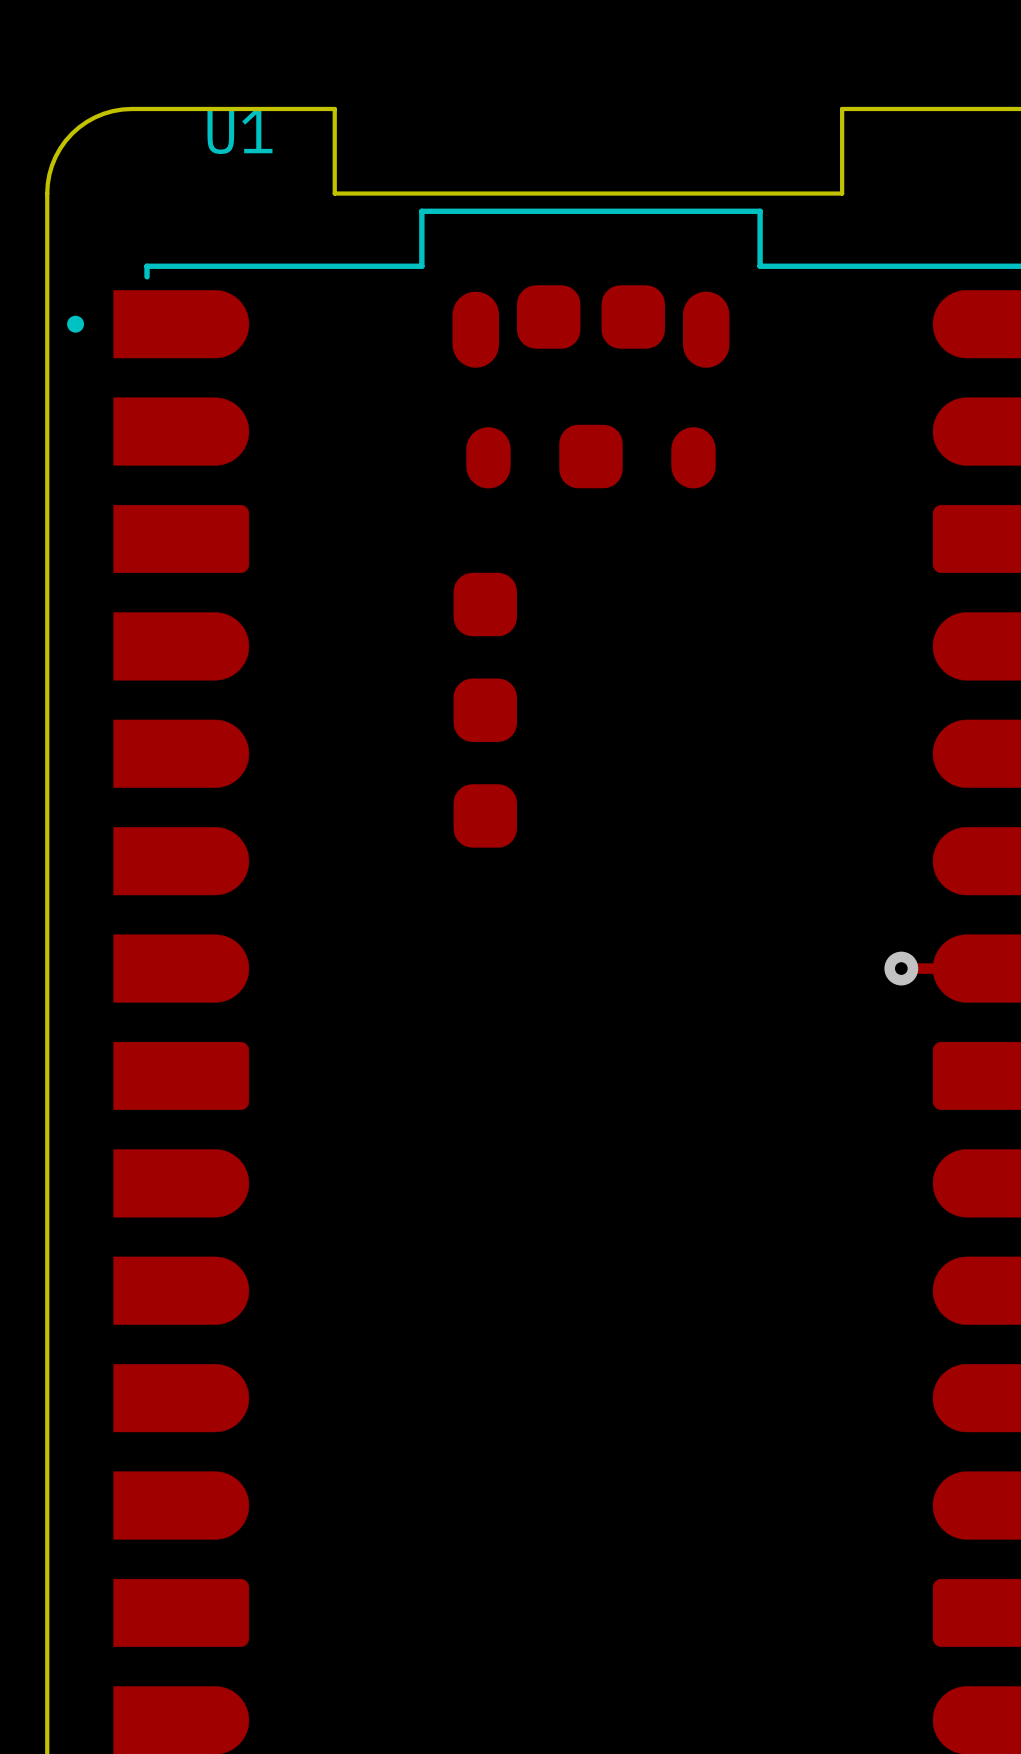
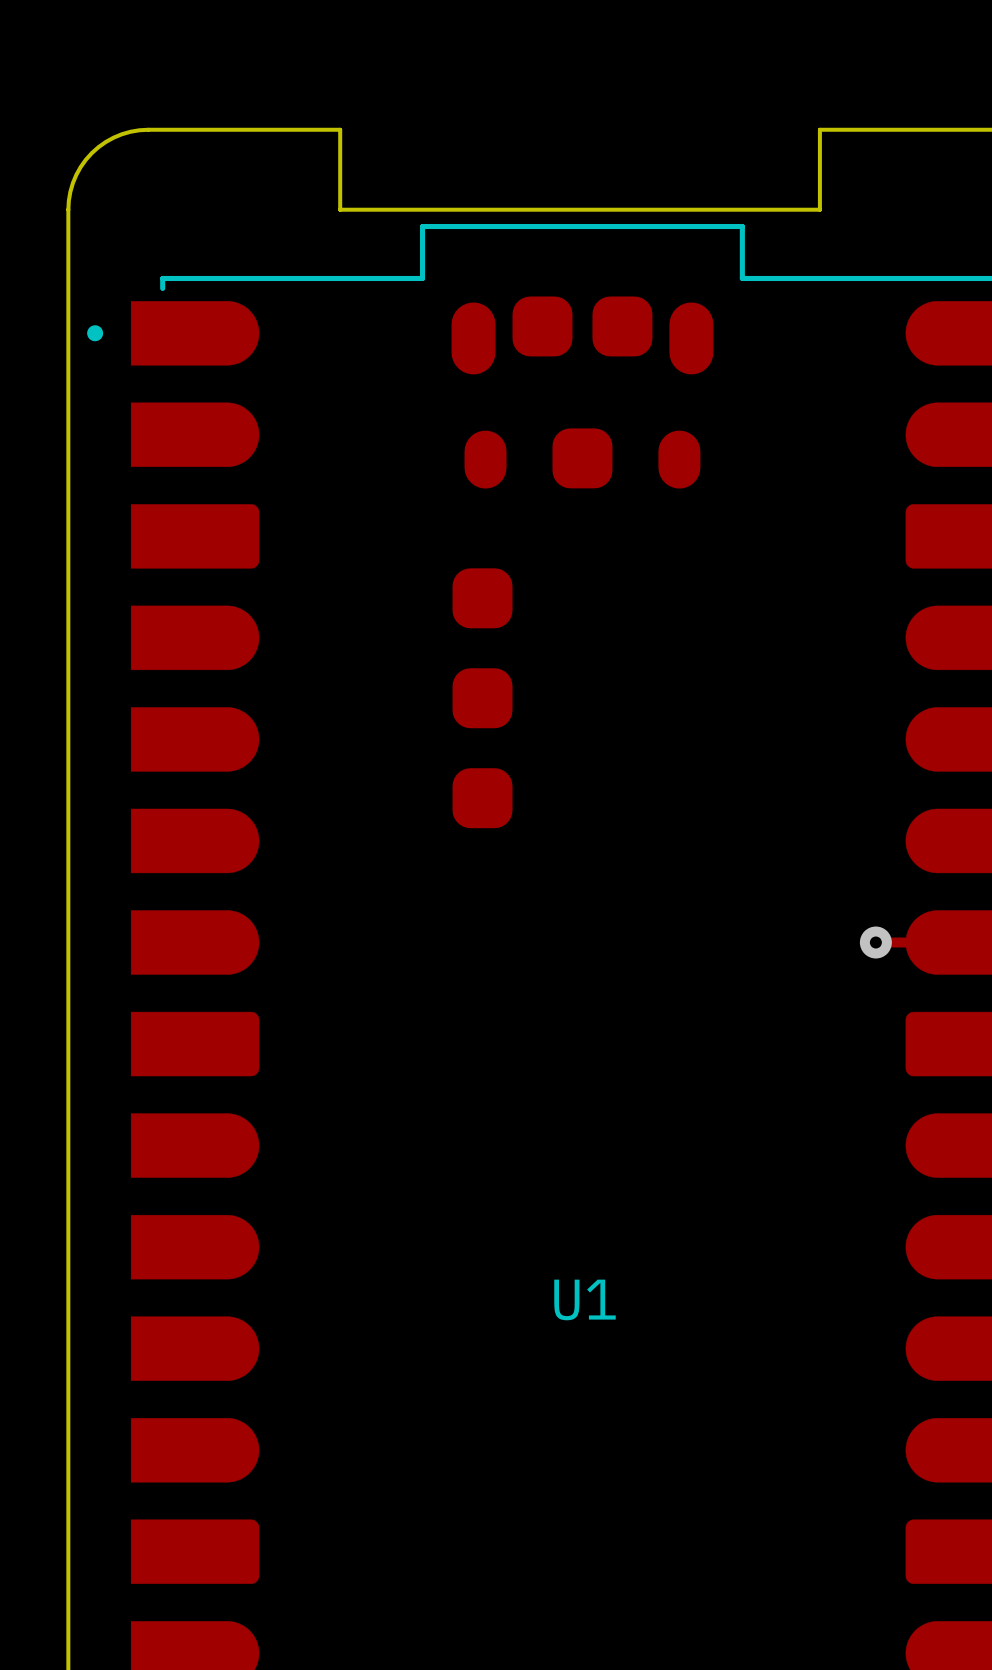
U1 name position: U1 (239, 132) -> U1 (585, 1299)

